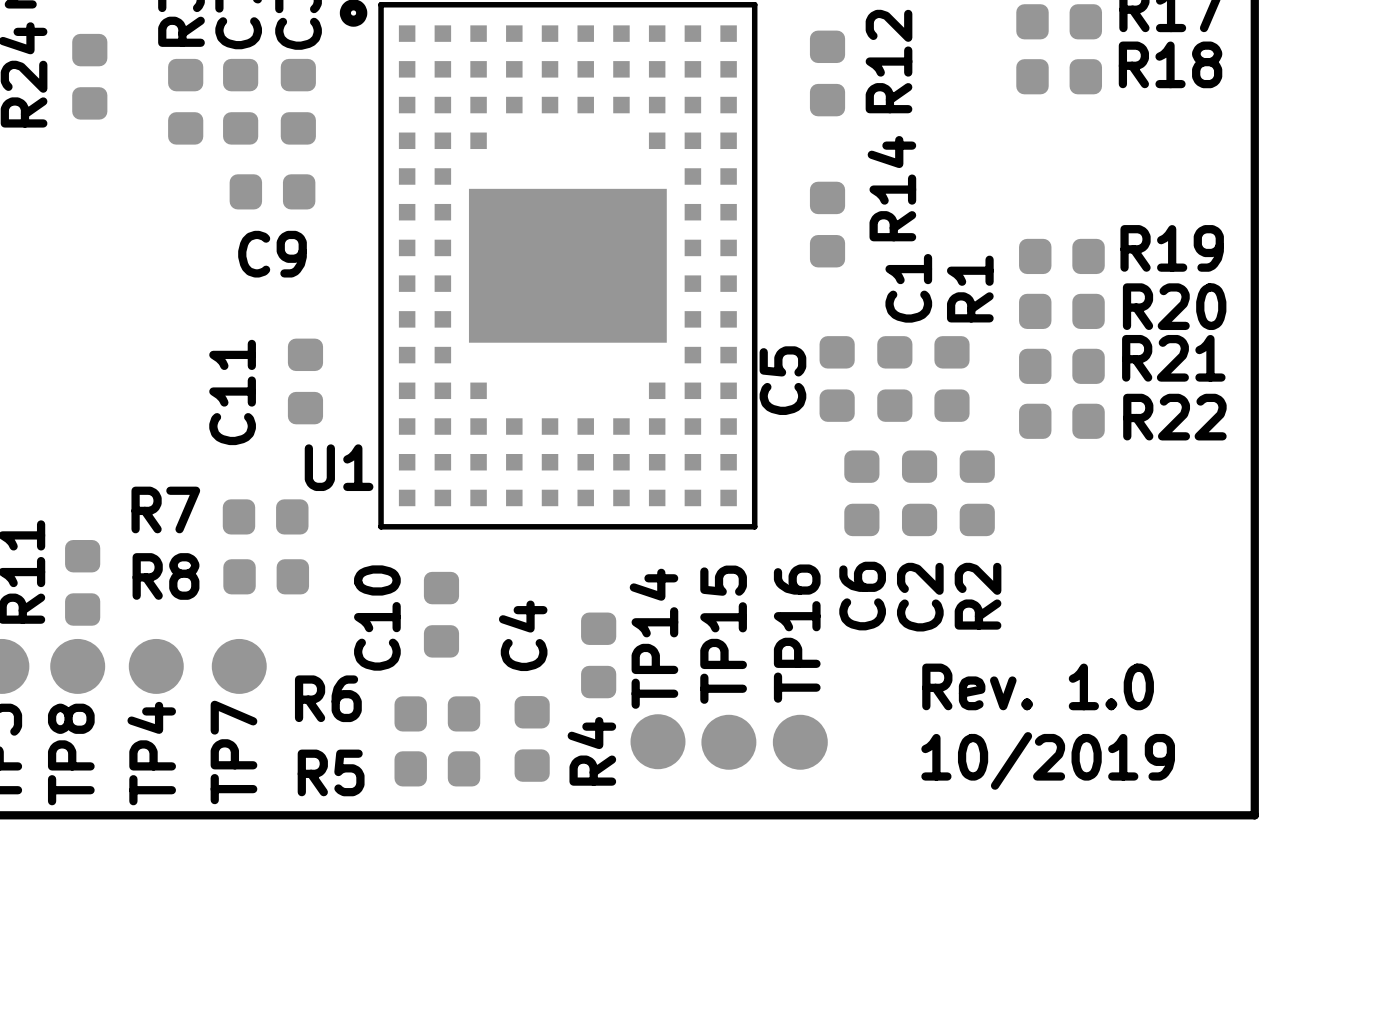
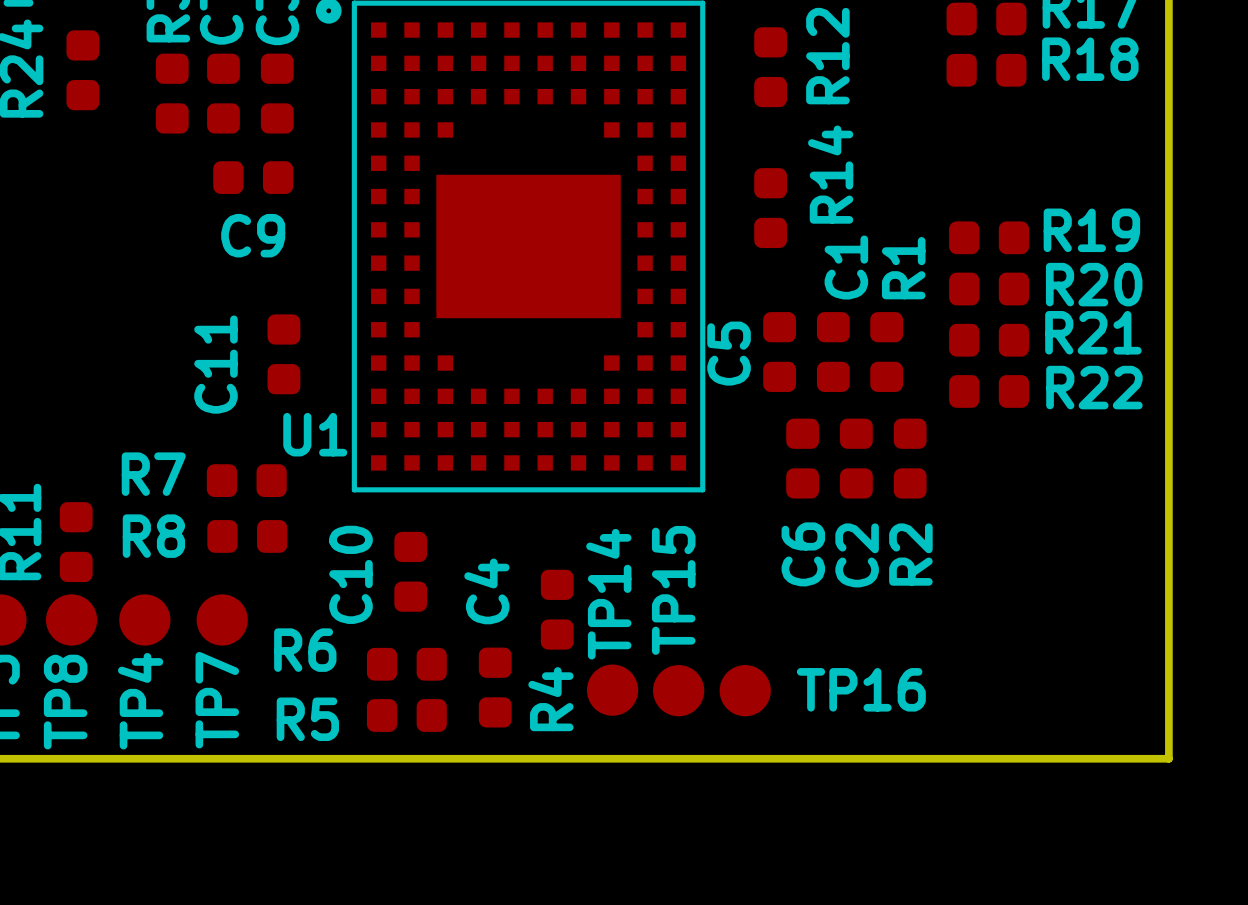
TP16 name rotation: 0° (797, 633) -> 90° clockwise (861, 689)
TP16 name position: TP16 (797, 633) -> TP16 (861, 689)
text: Rev. 1.0 (1038, 686) -> none
text: 10/2019 (1048, 760) -> none

